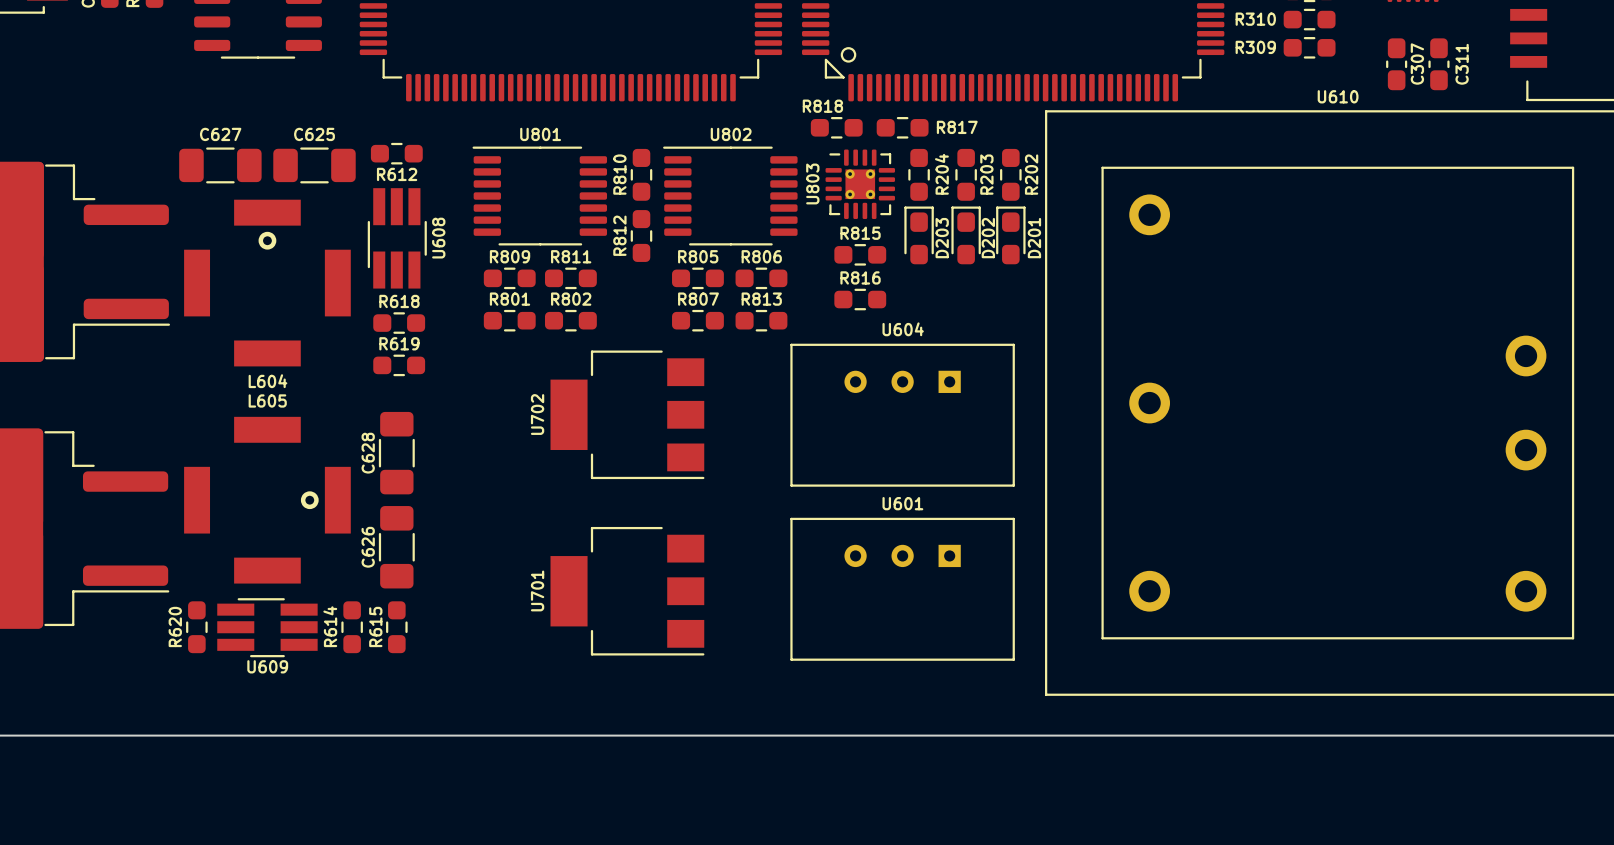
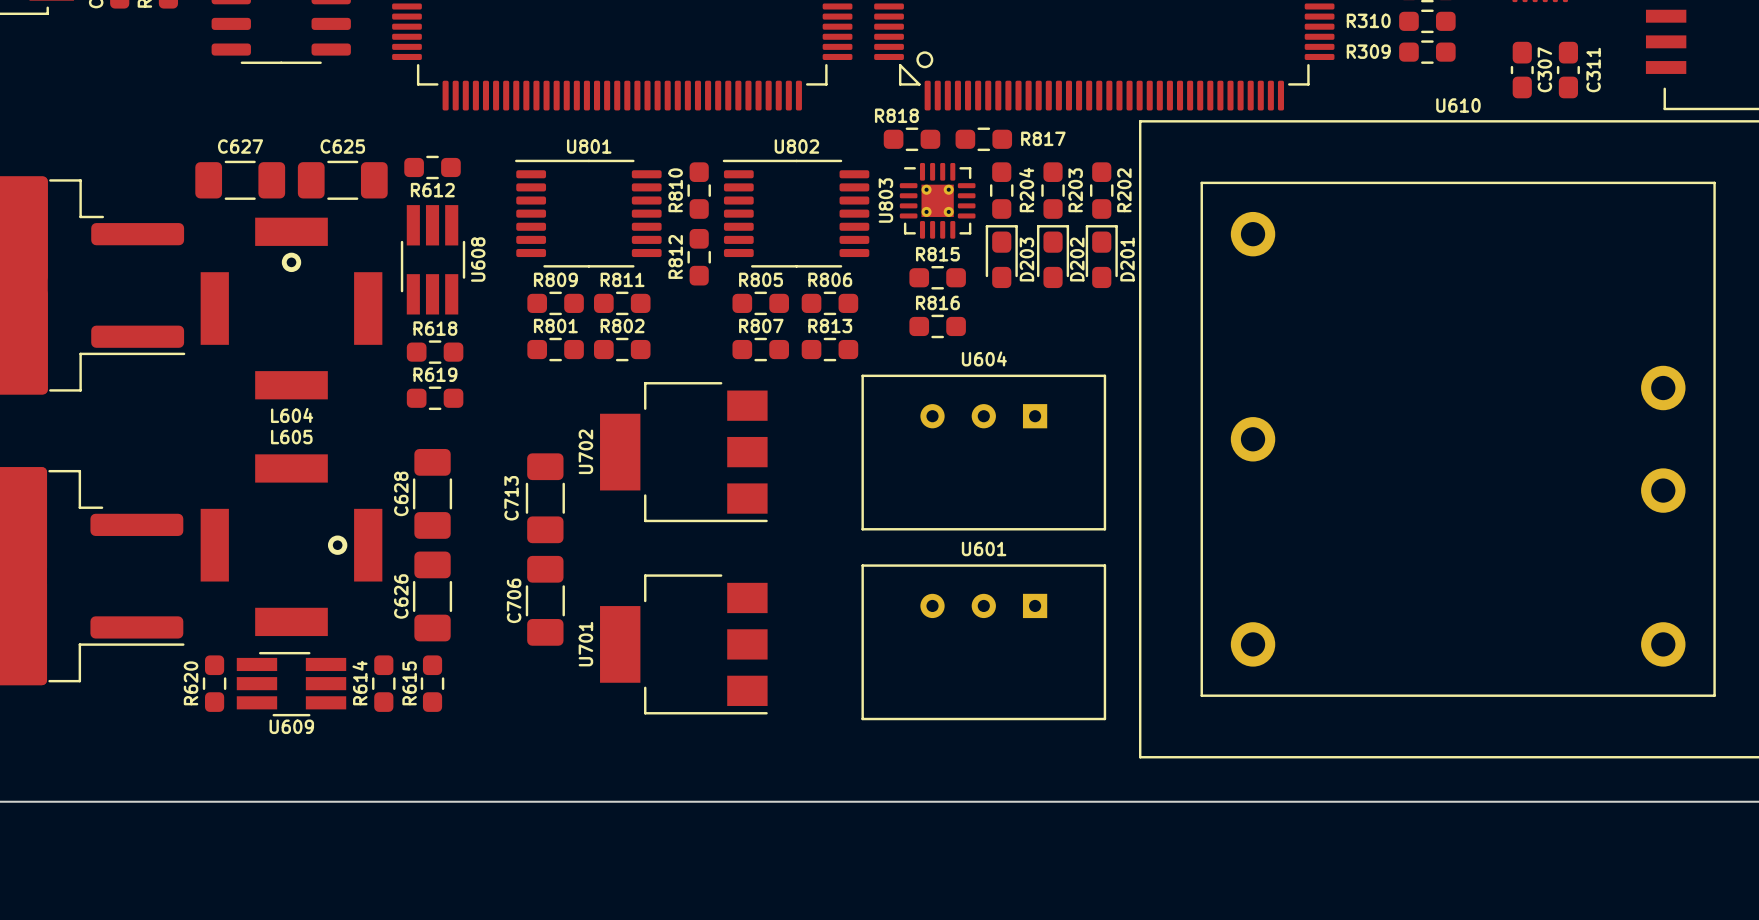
C713: none -> (545, 498)
C706: none -> (545, 600)

